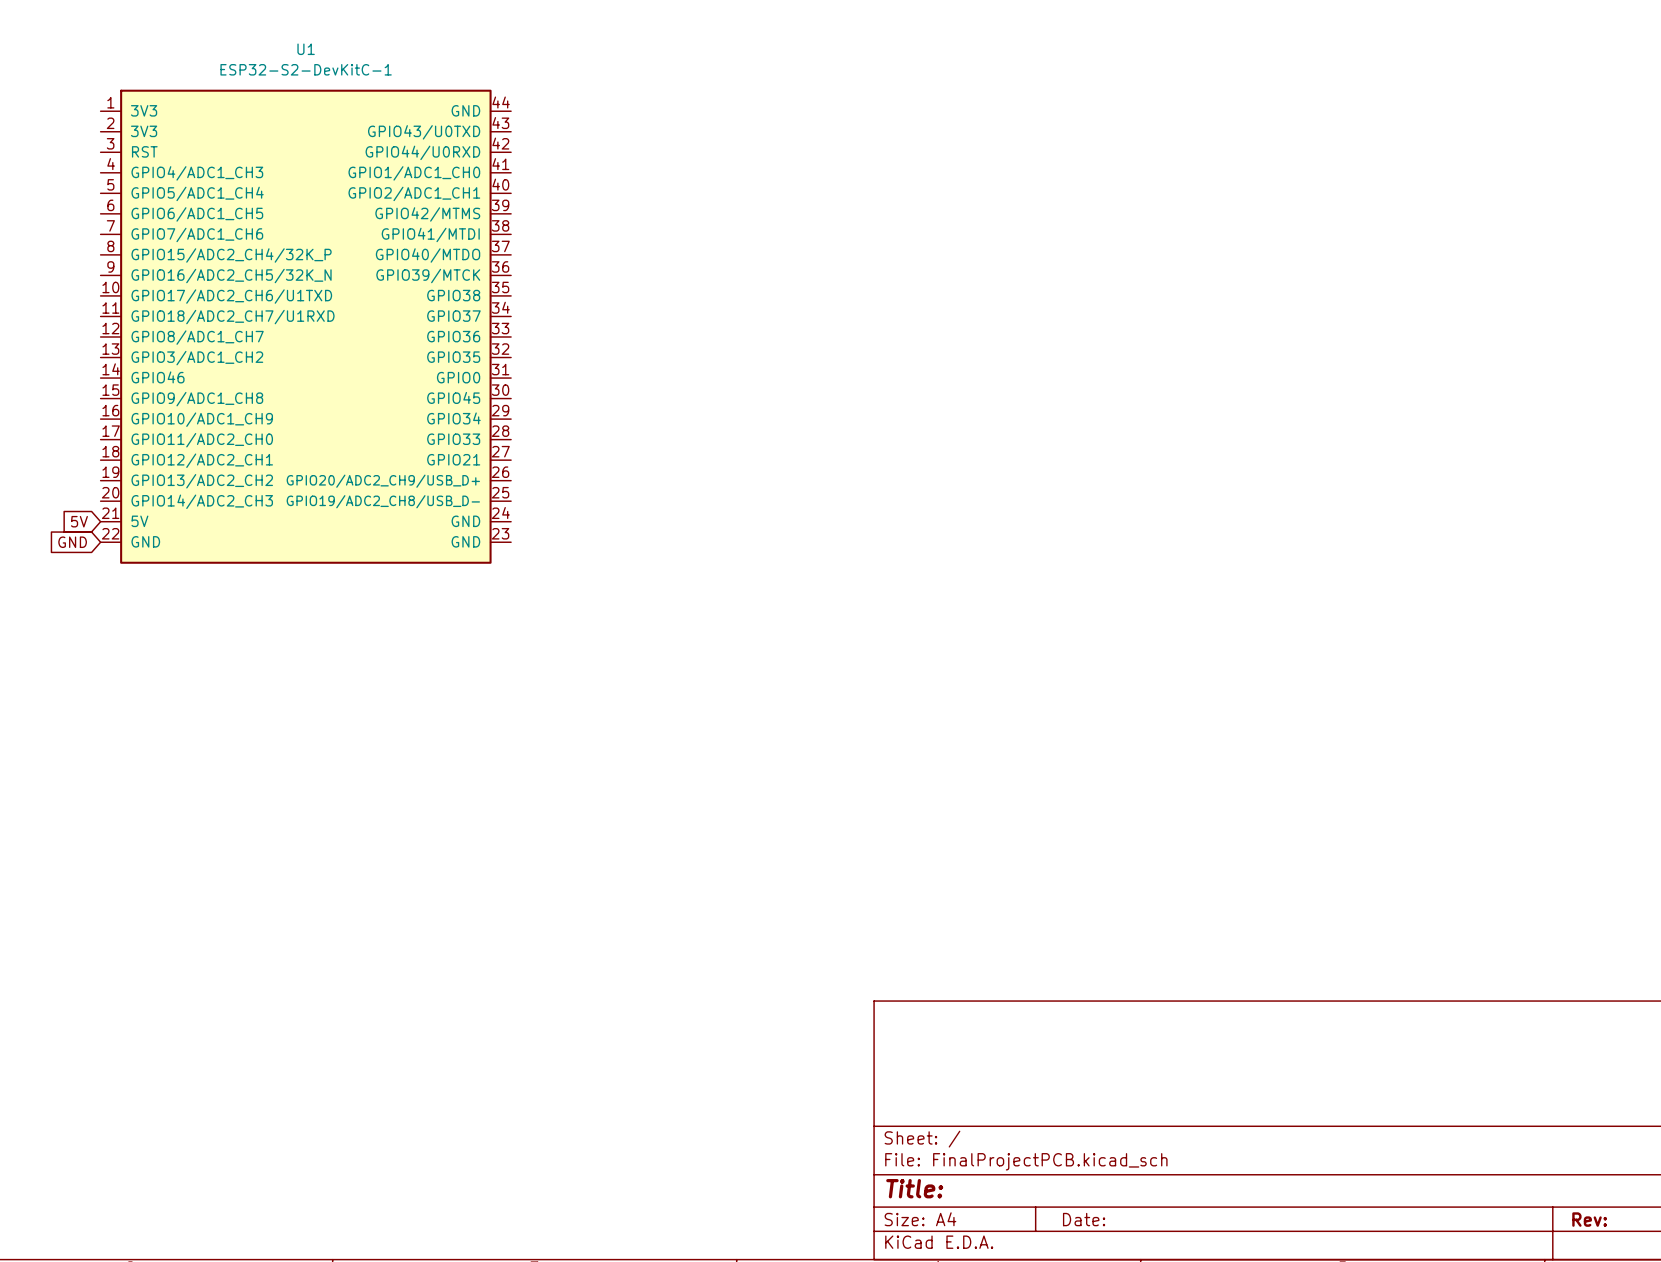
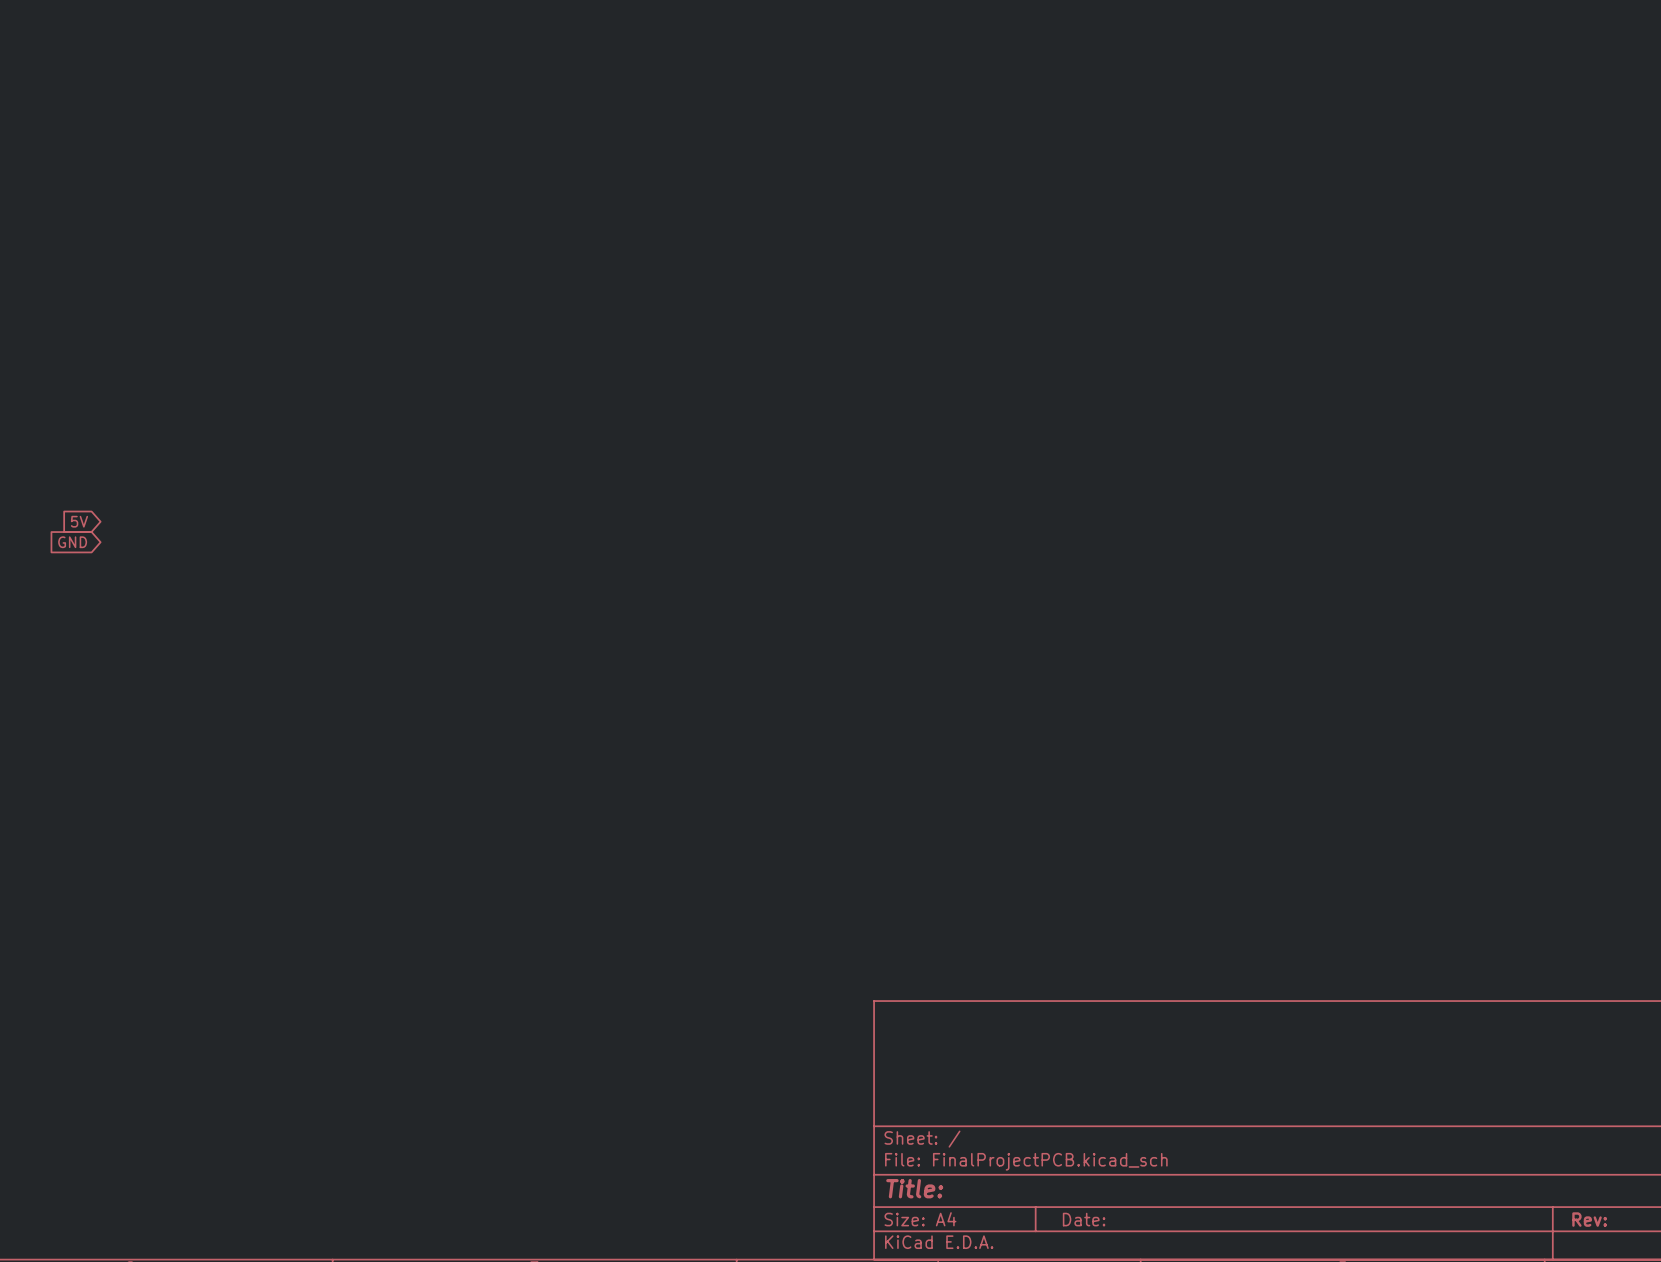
U1: ESP32-S2-DevKitC-1 (305, 326) -> none

